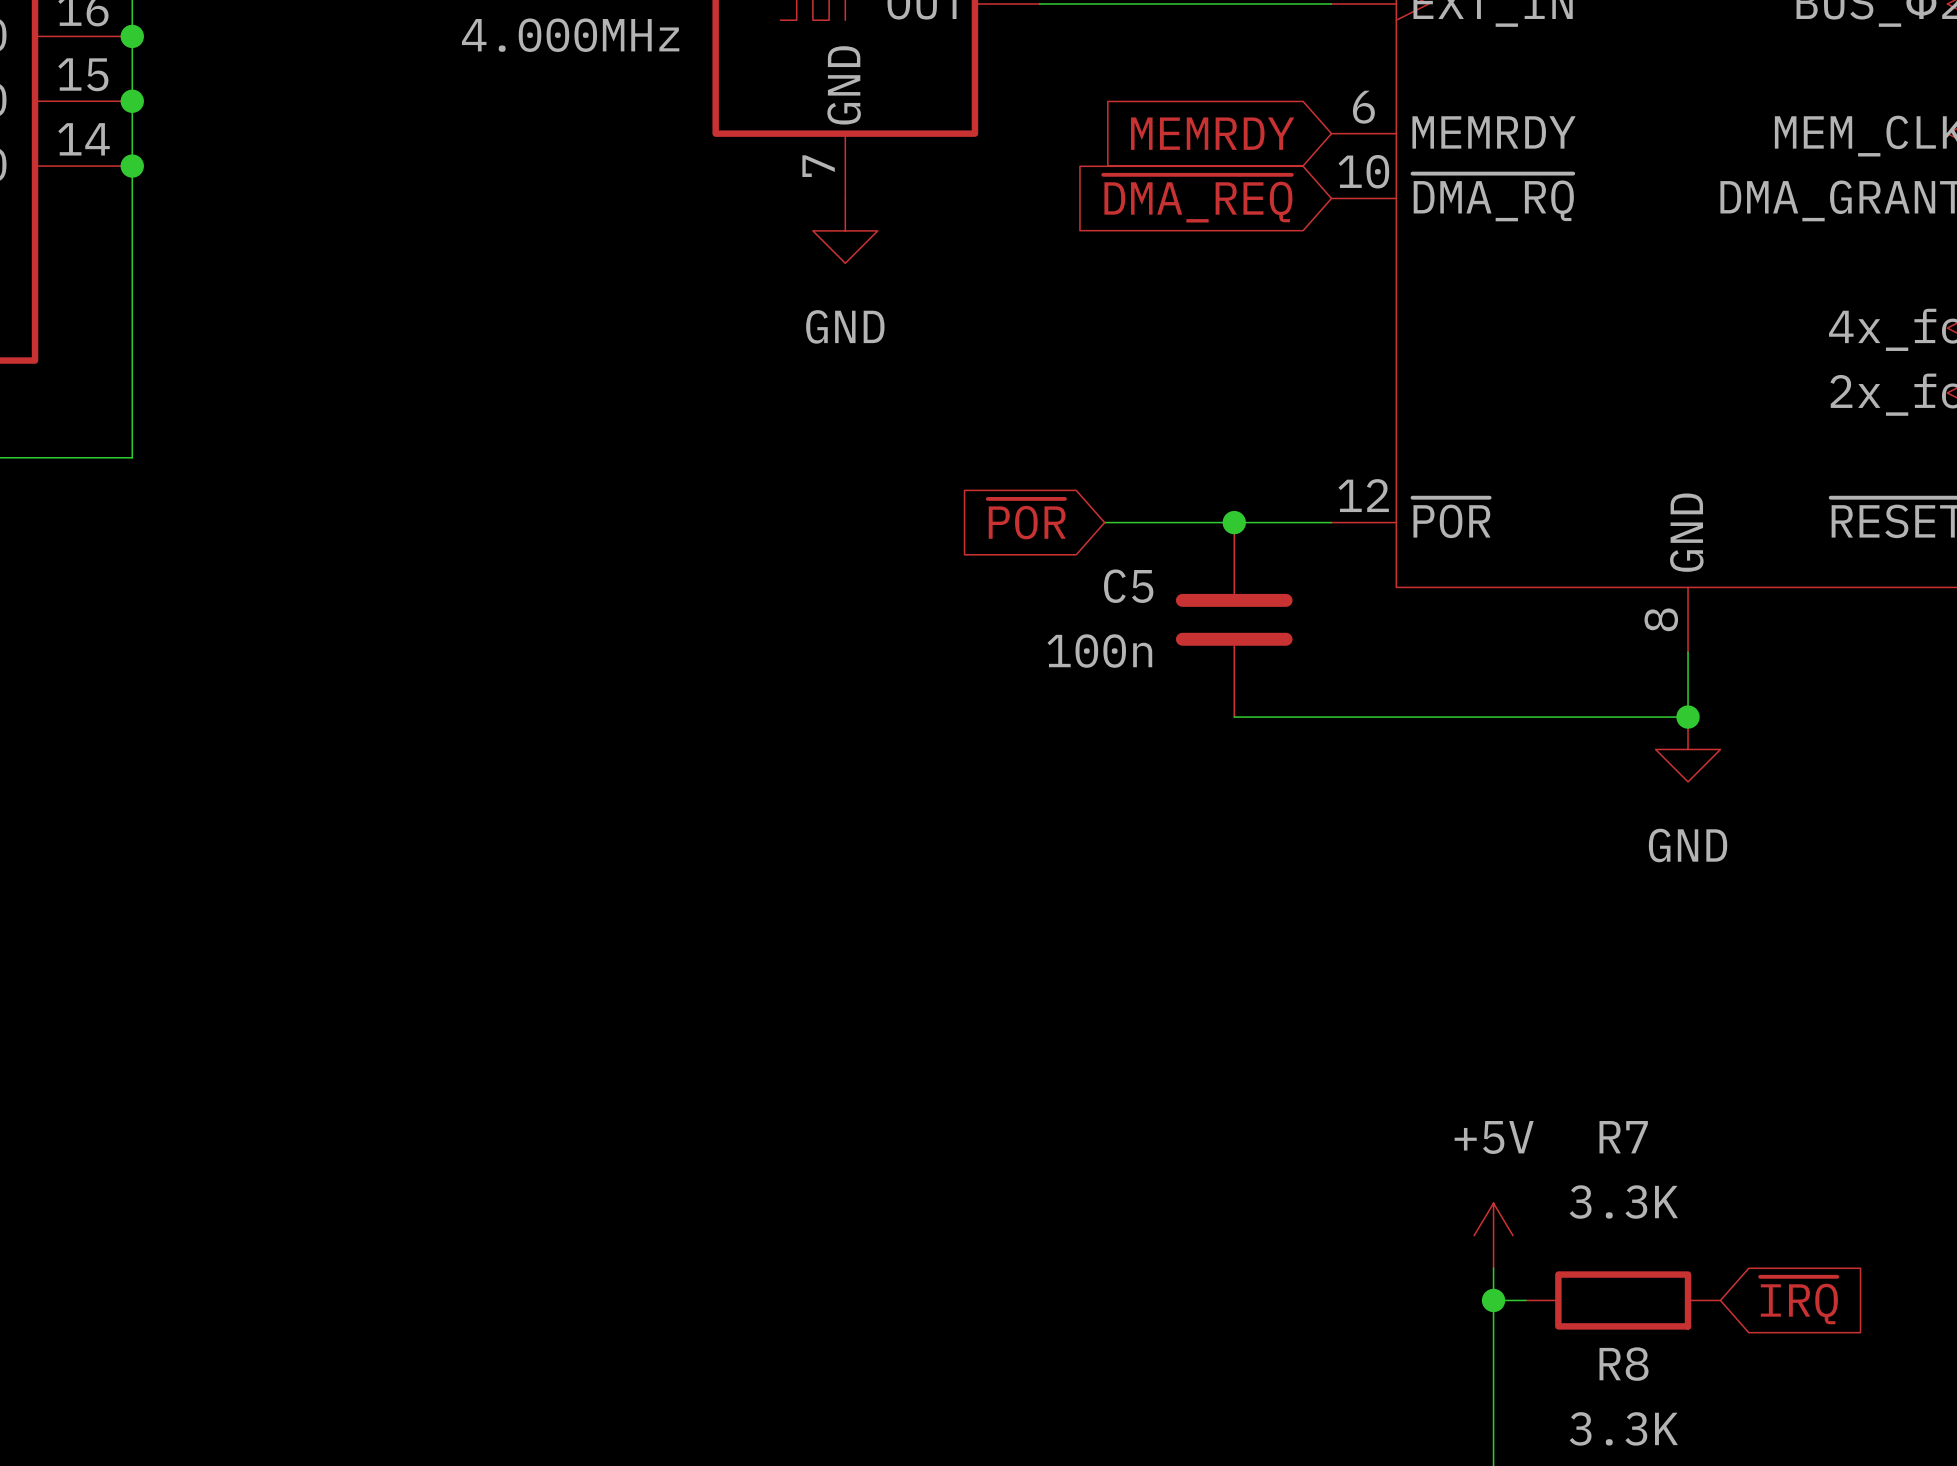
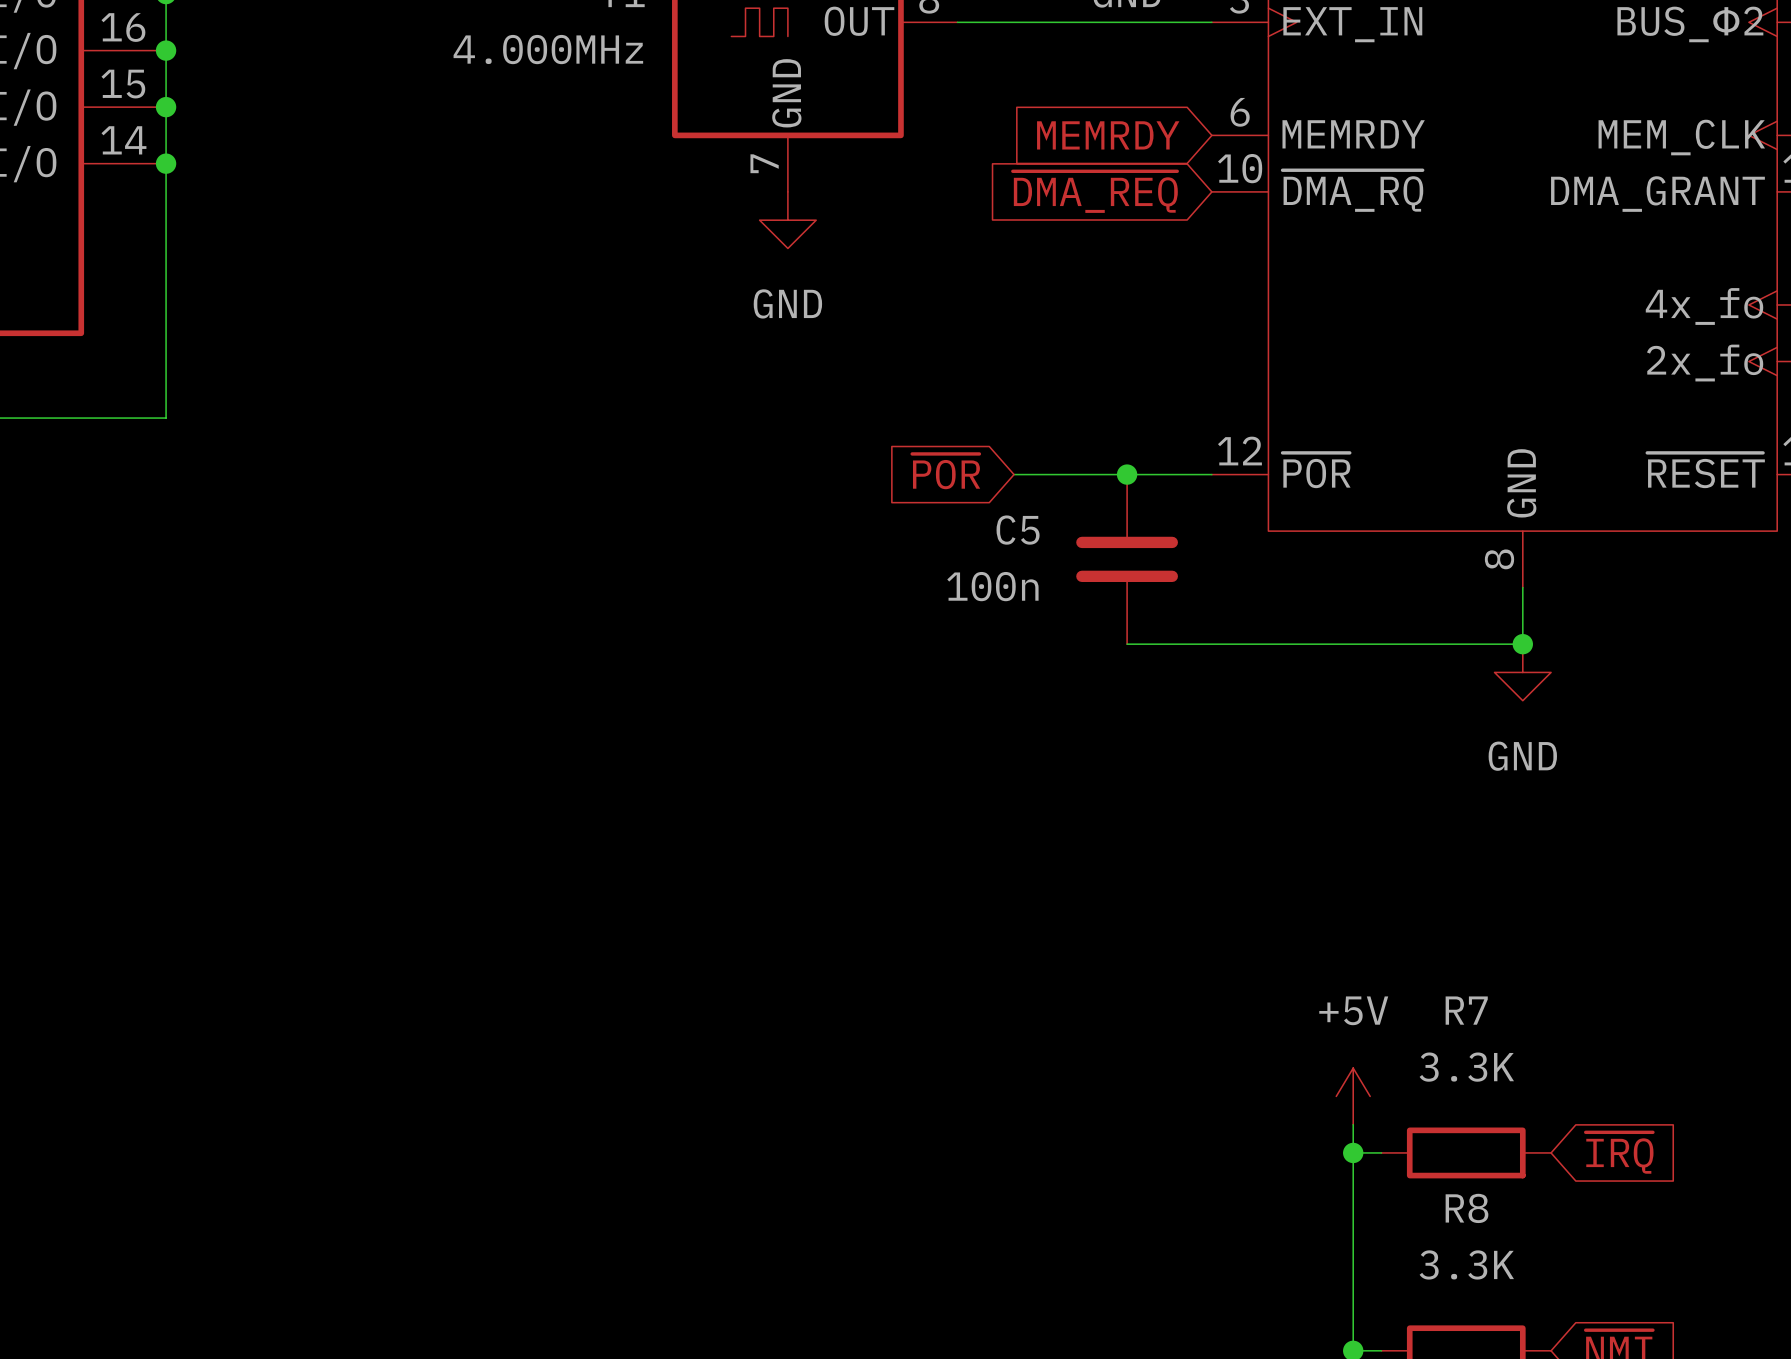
C5 name position: C5 (1128, 586) -> C5 (1018, 530)
C5 value position: 100n (1099, 651) -> 100n (992, 586)

